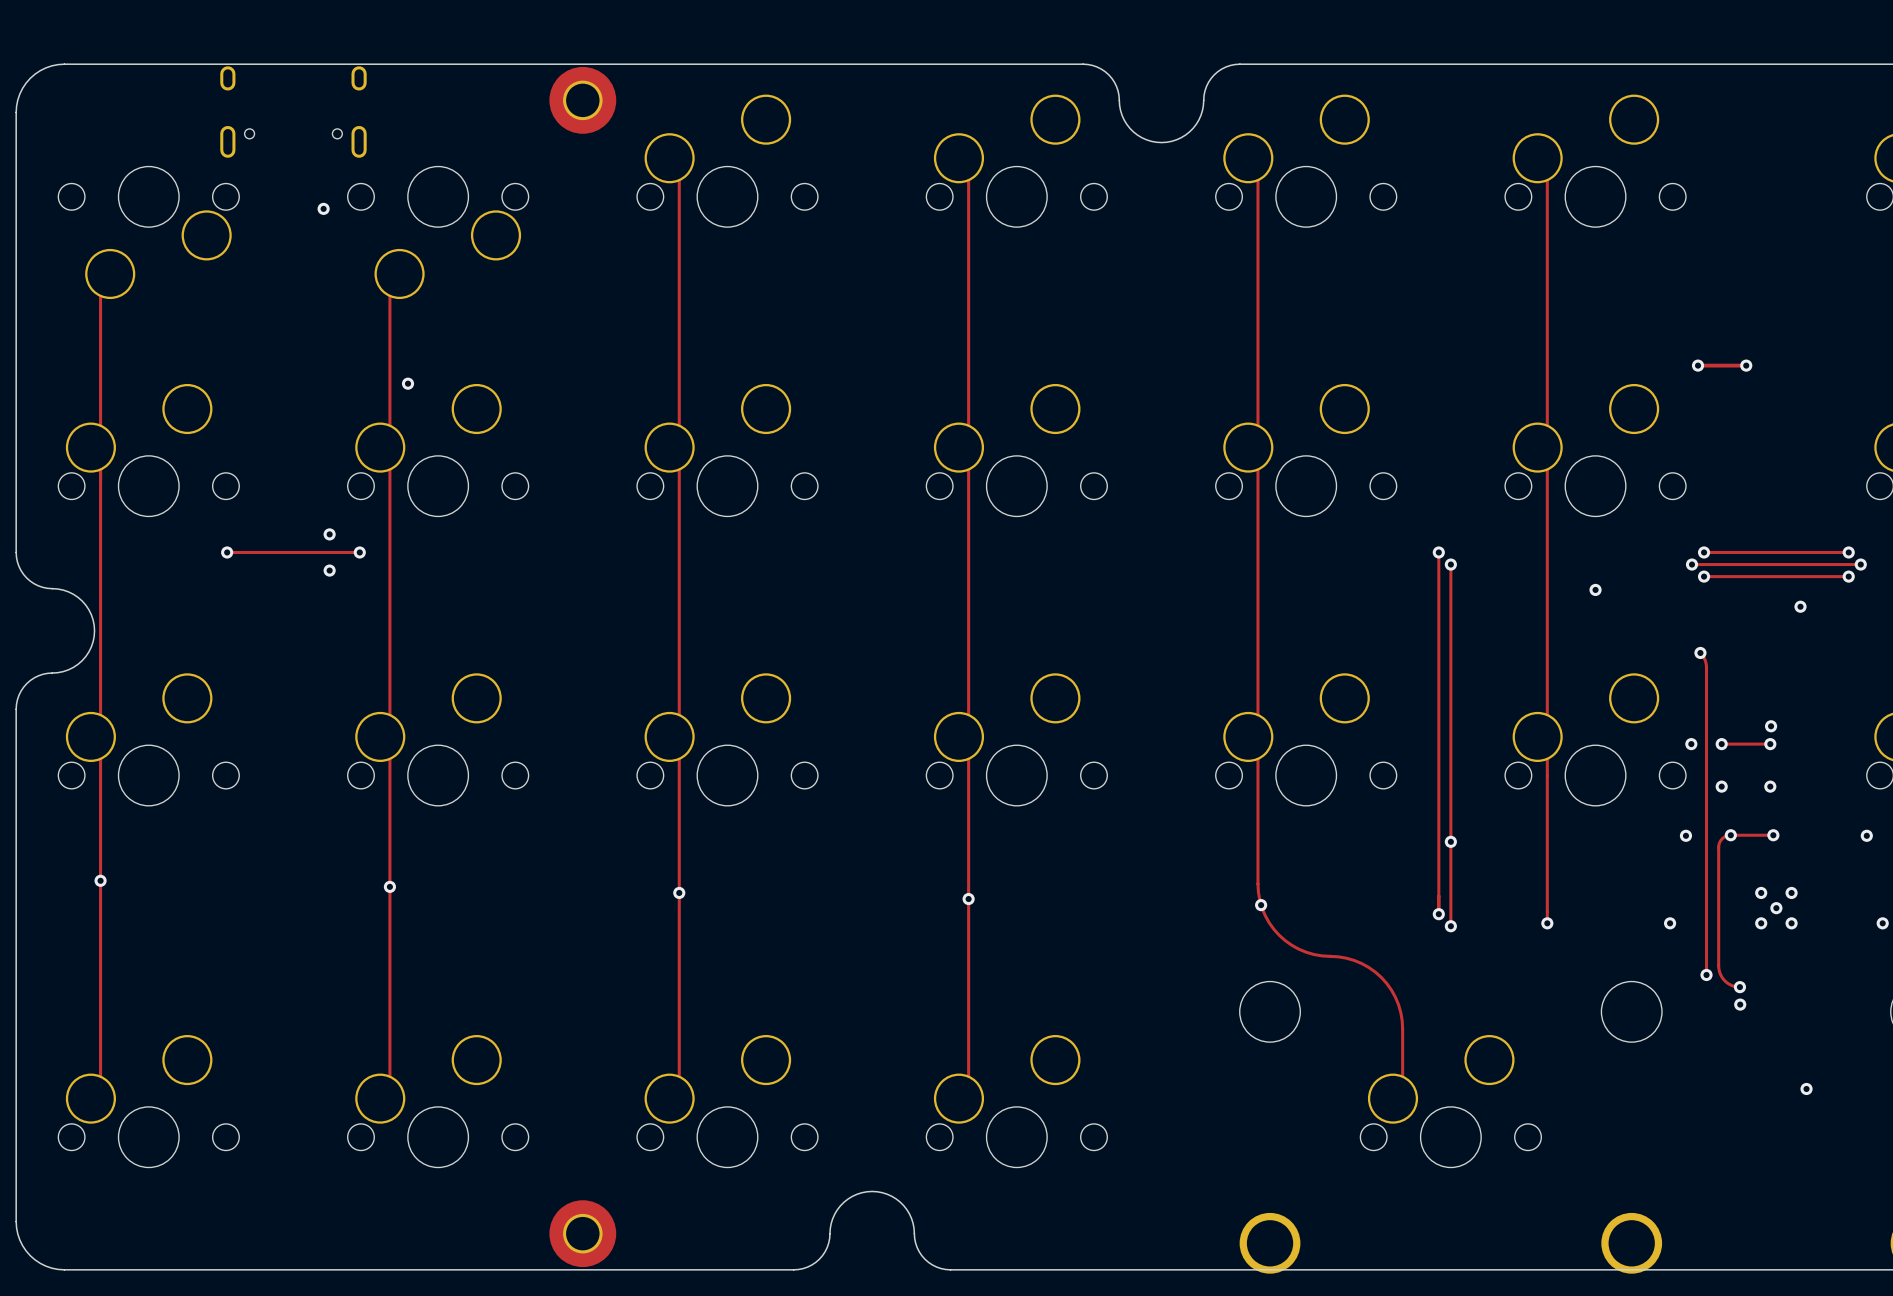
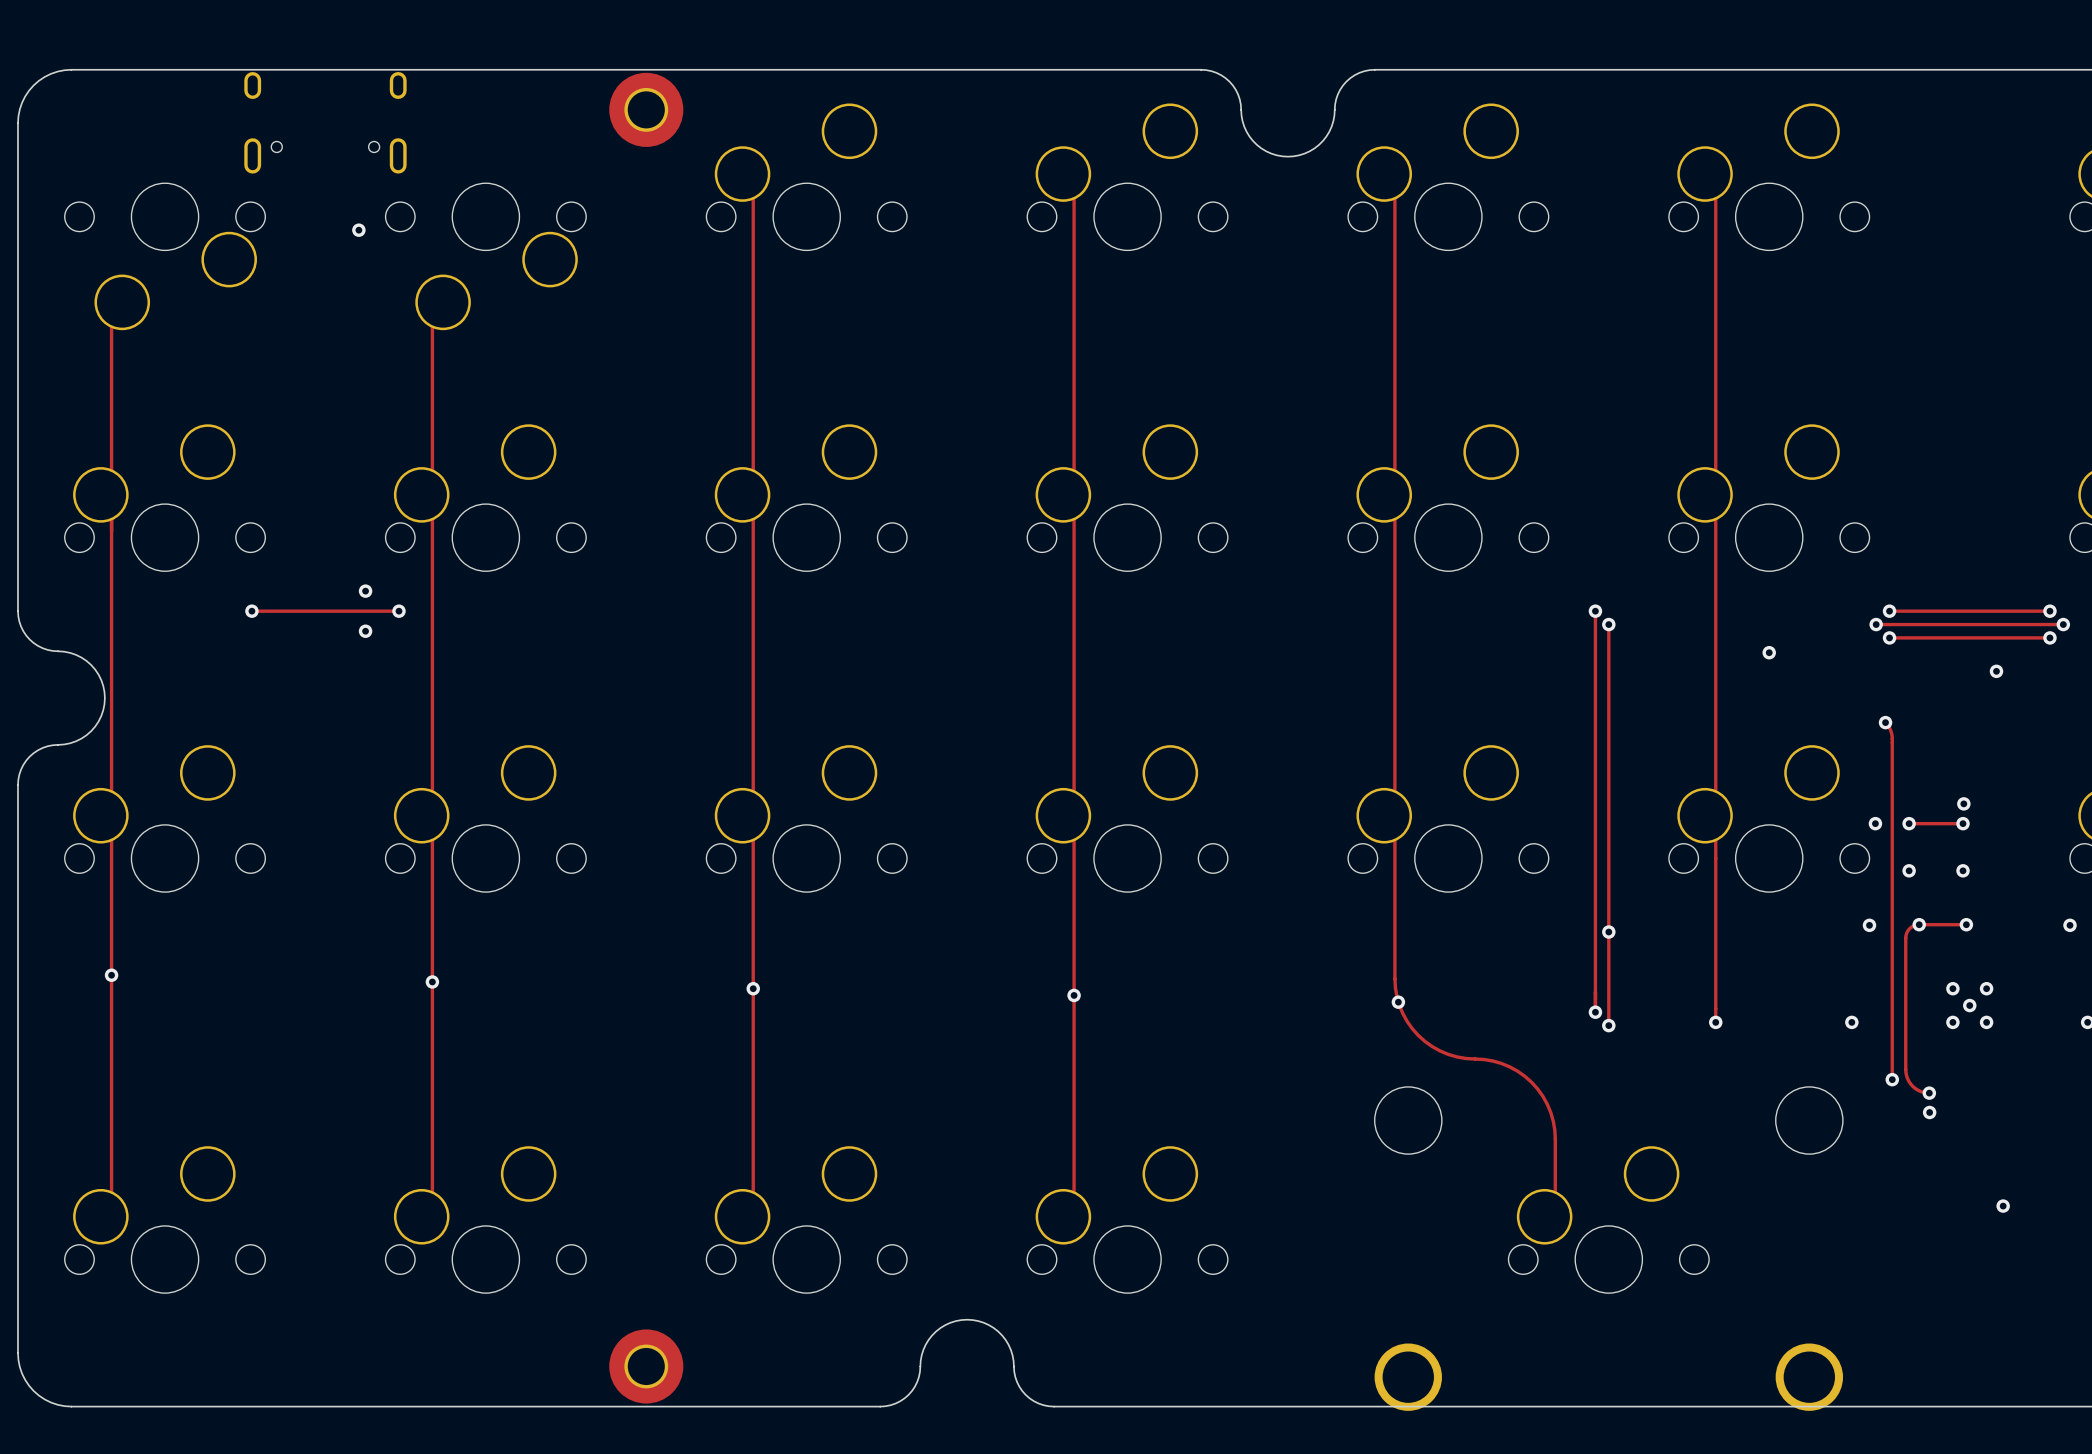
track: (1698, 365) (1746, 365) -> none
via: (1698, 365) -> none
via: (1746, 365) -> none
via: (408, 383) -> none

